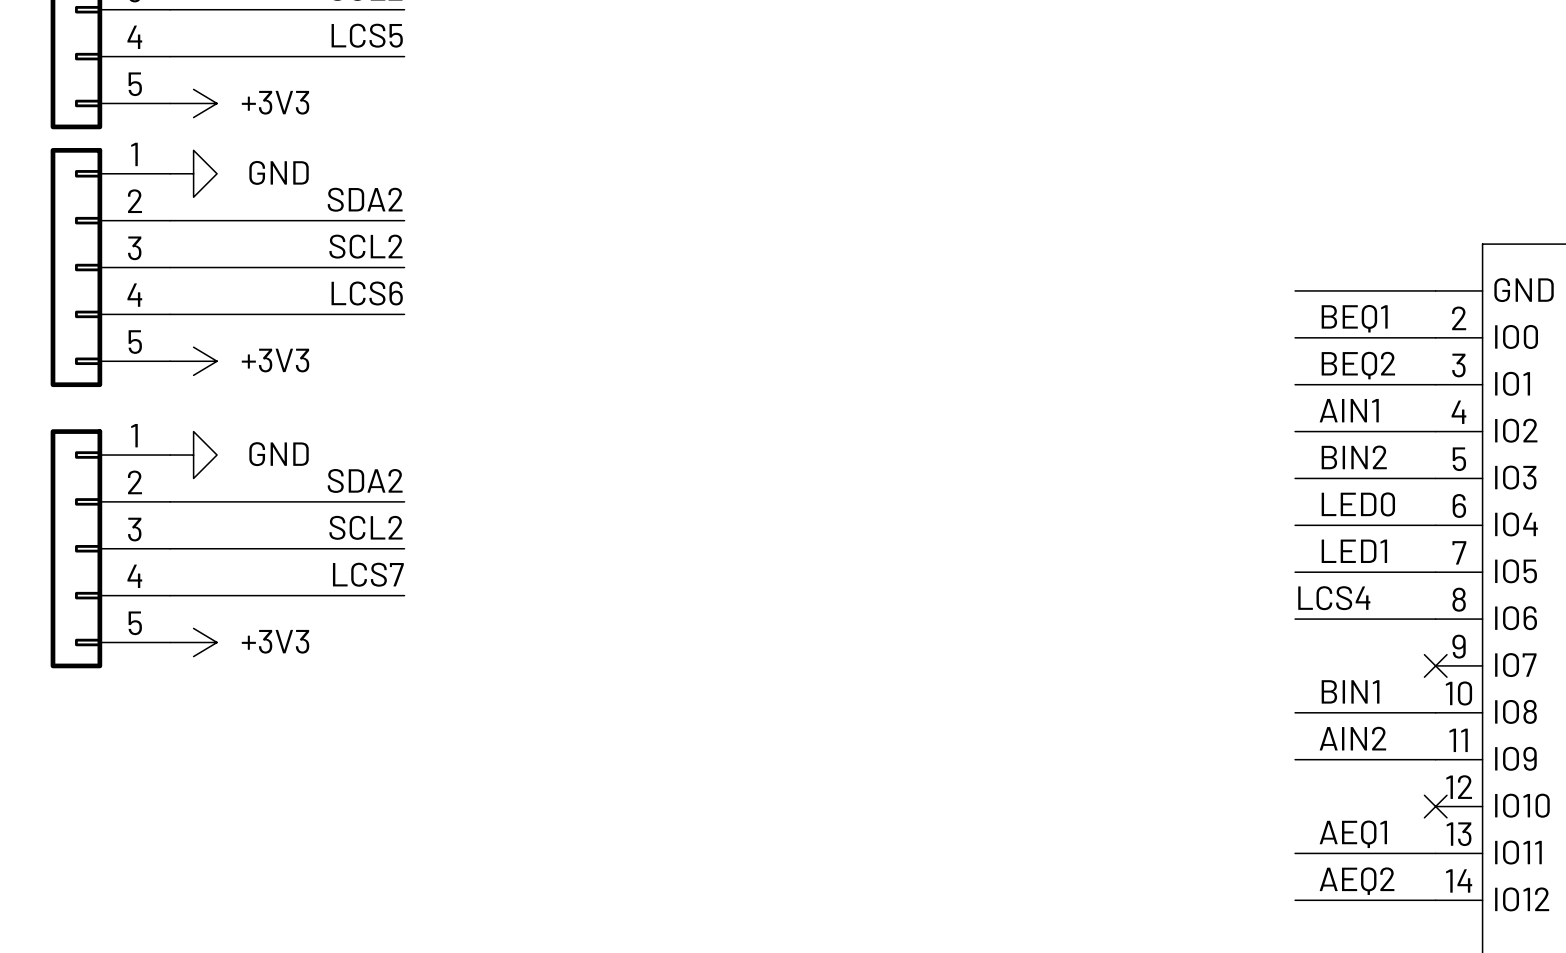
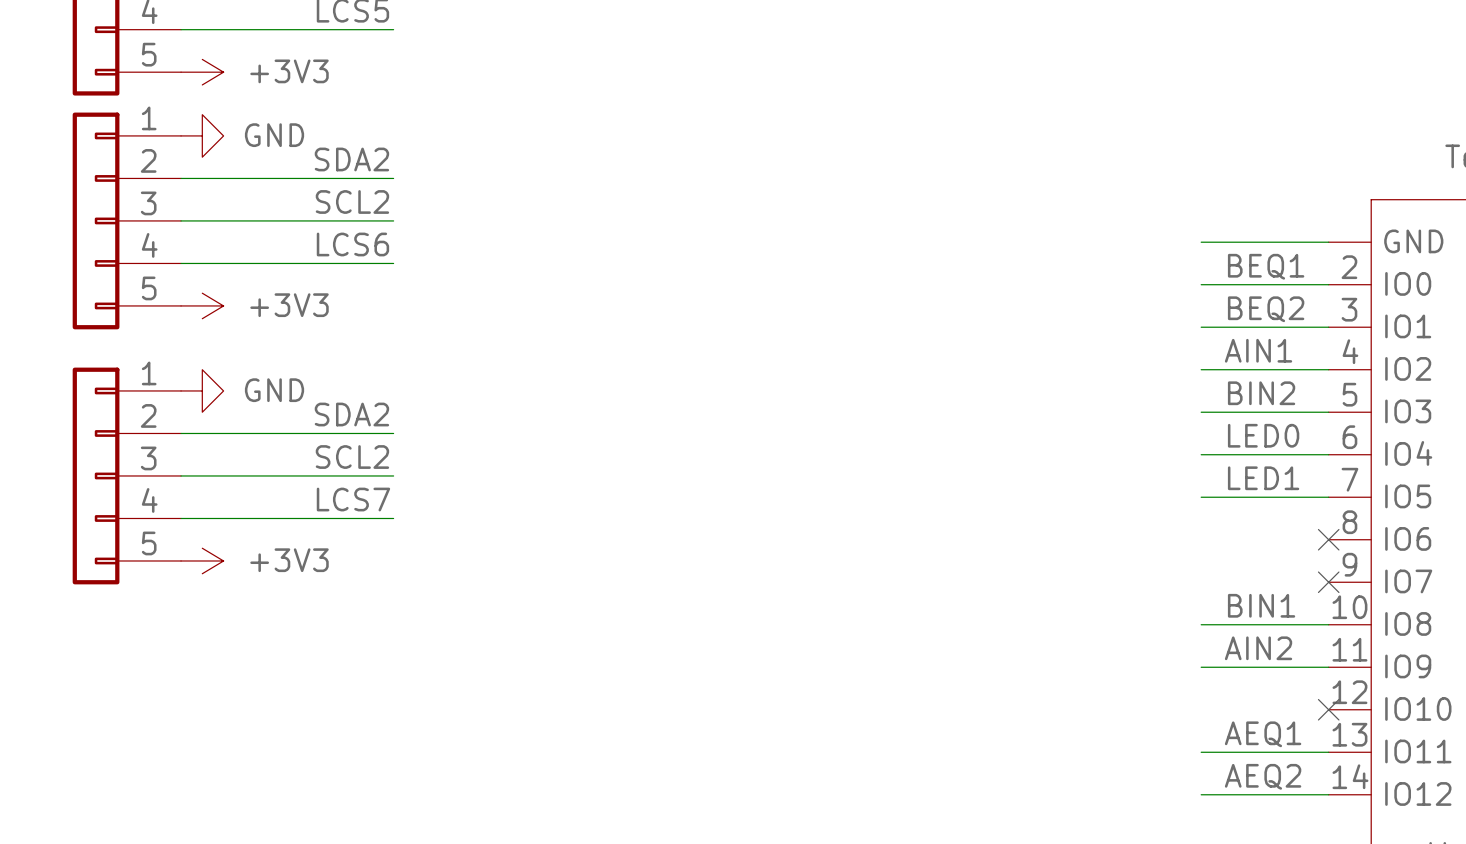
label: LCS4 (1334, 598) -> none
wire: (1295, 619) (1435, 619) -> none
no-connect mark: none -> (1328, 539)

